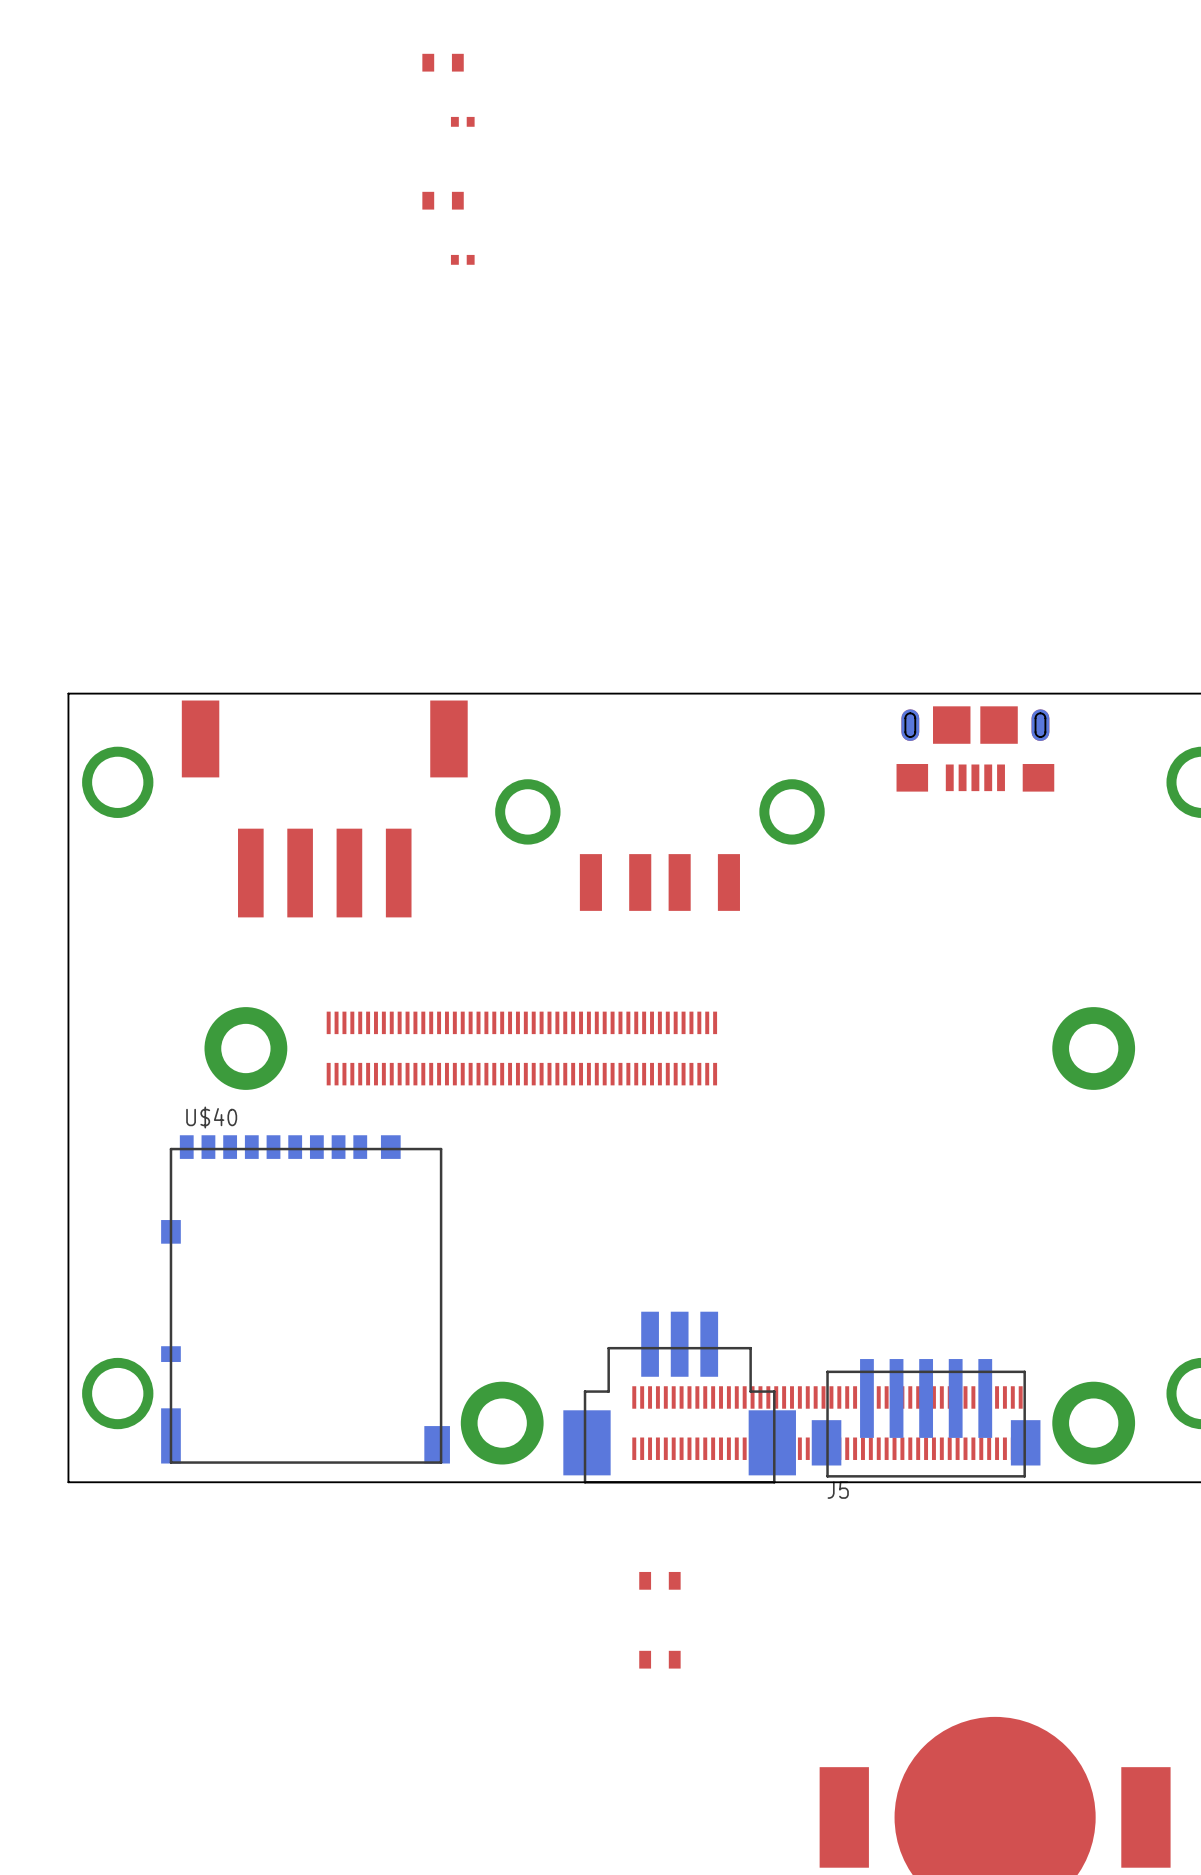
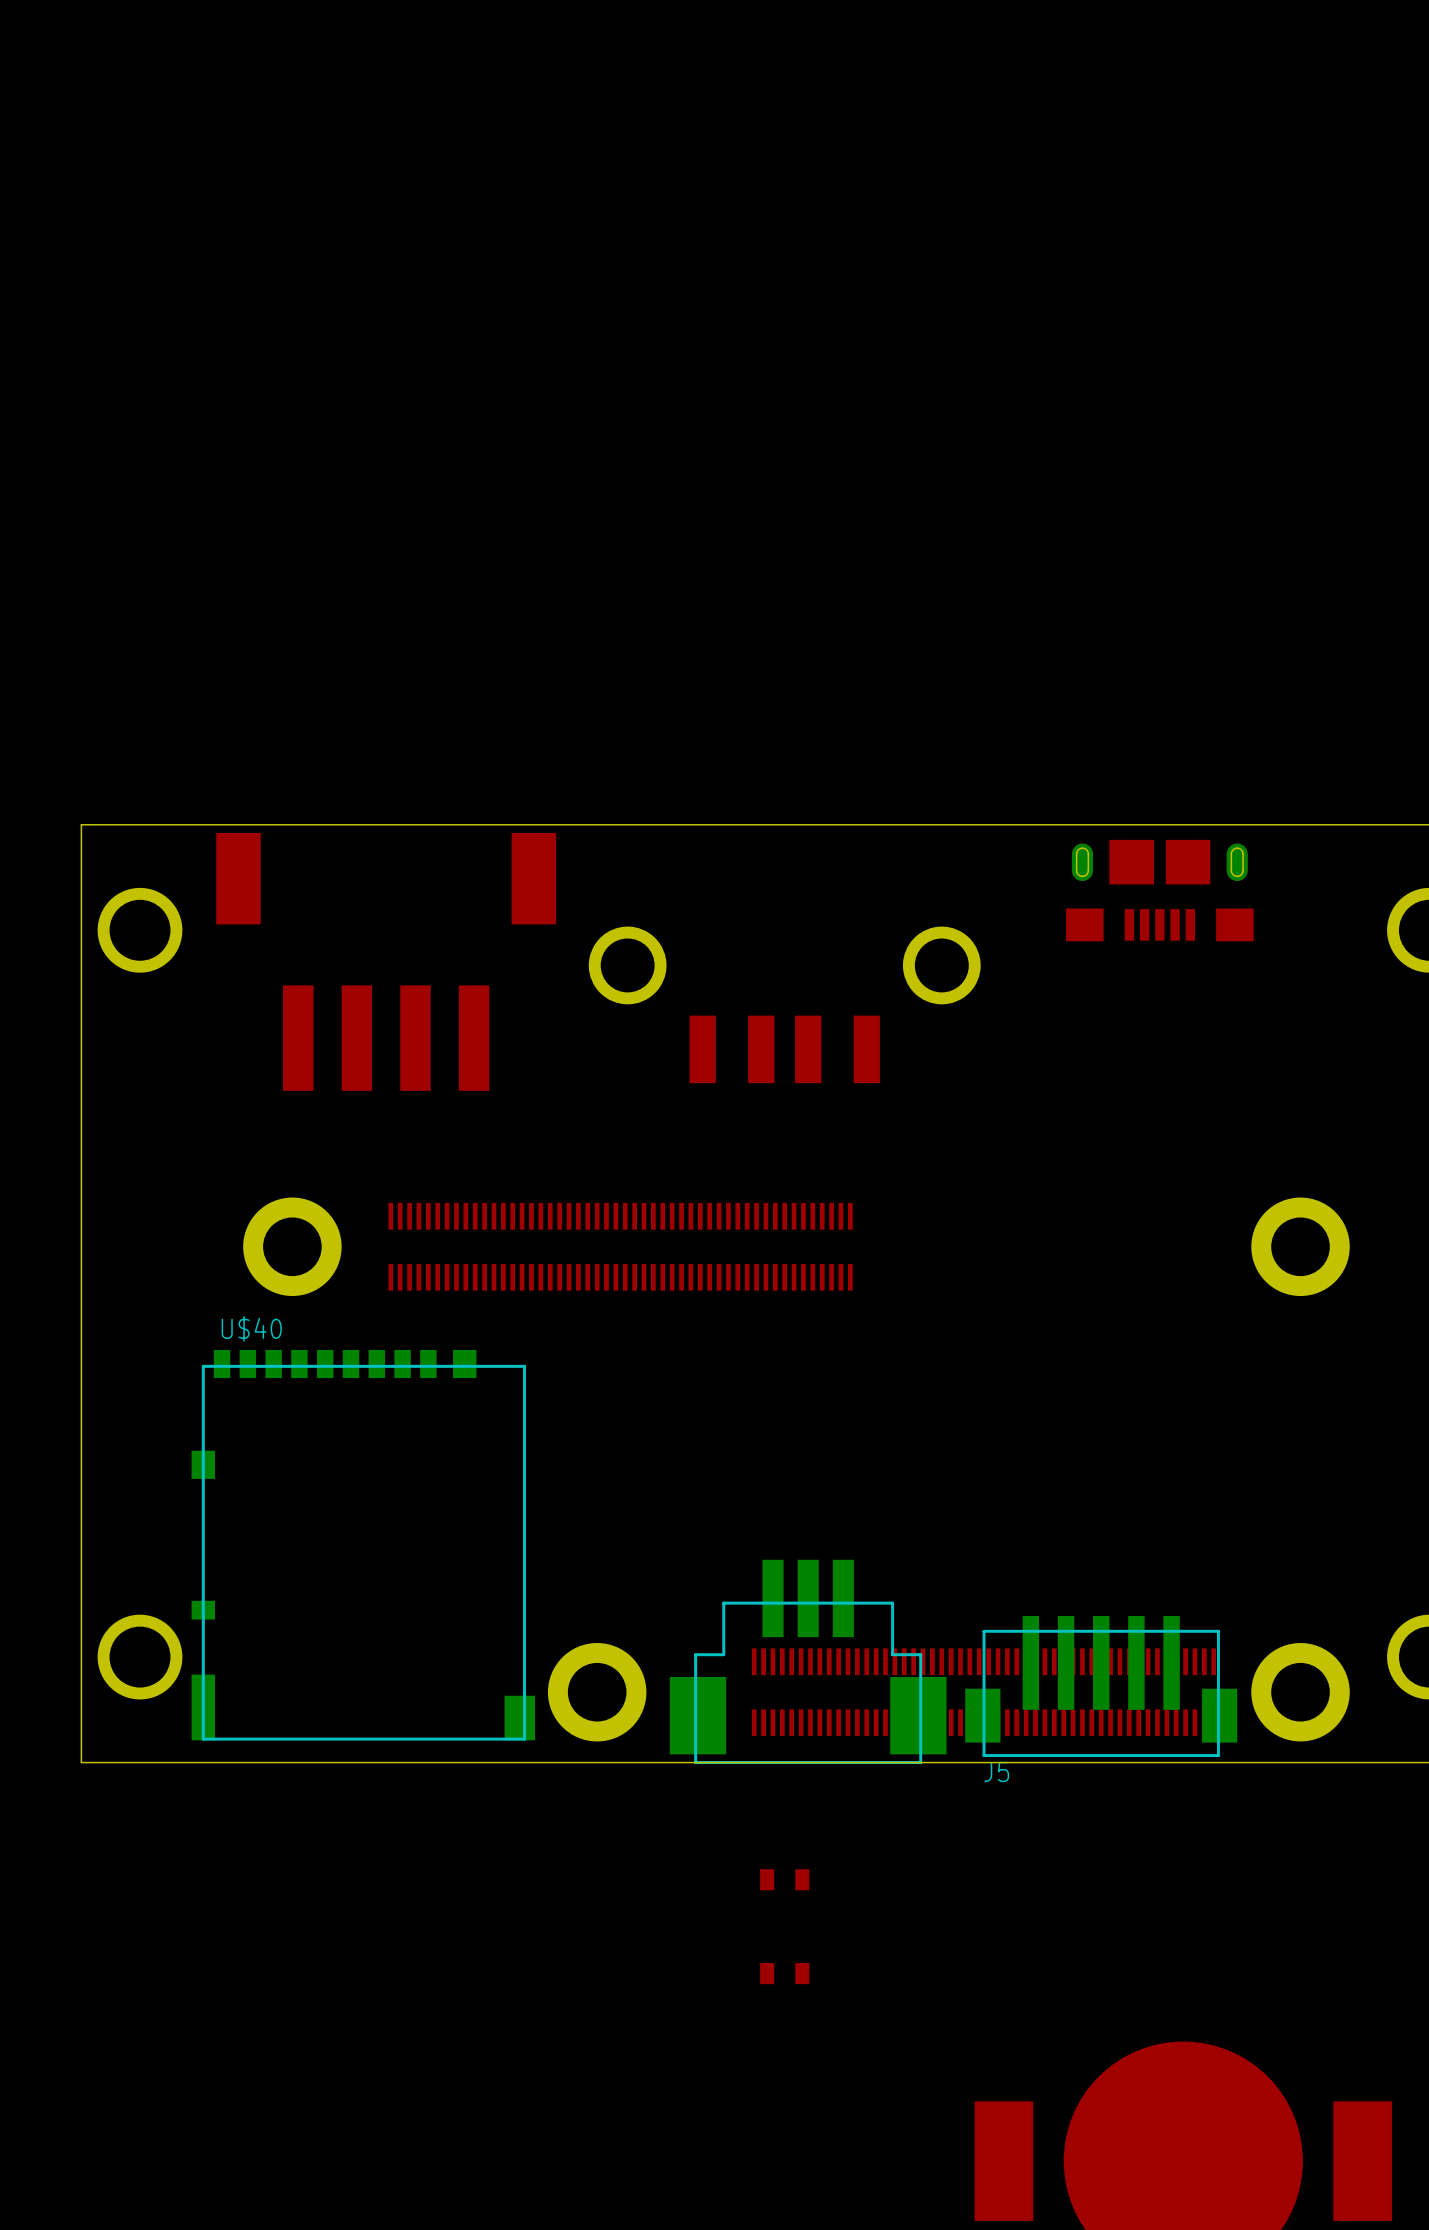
part: (443, 62) -> none
part: (462, 121) -> none
part: (443, 200) -> none
part: (462, 259) -> none

